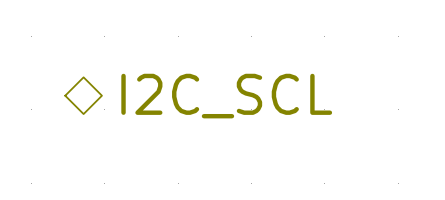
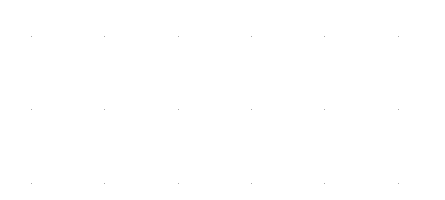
hierarchical label: I2C_SCL (226, 96) -> none

